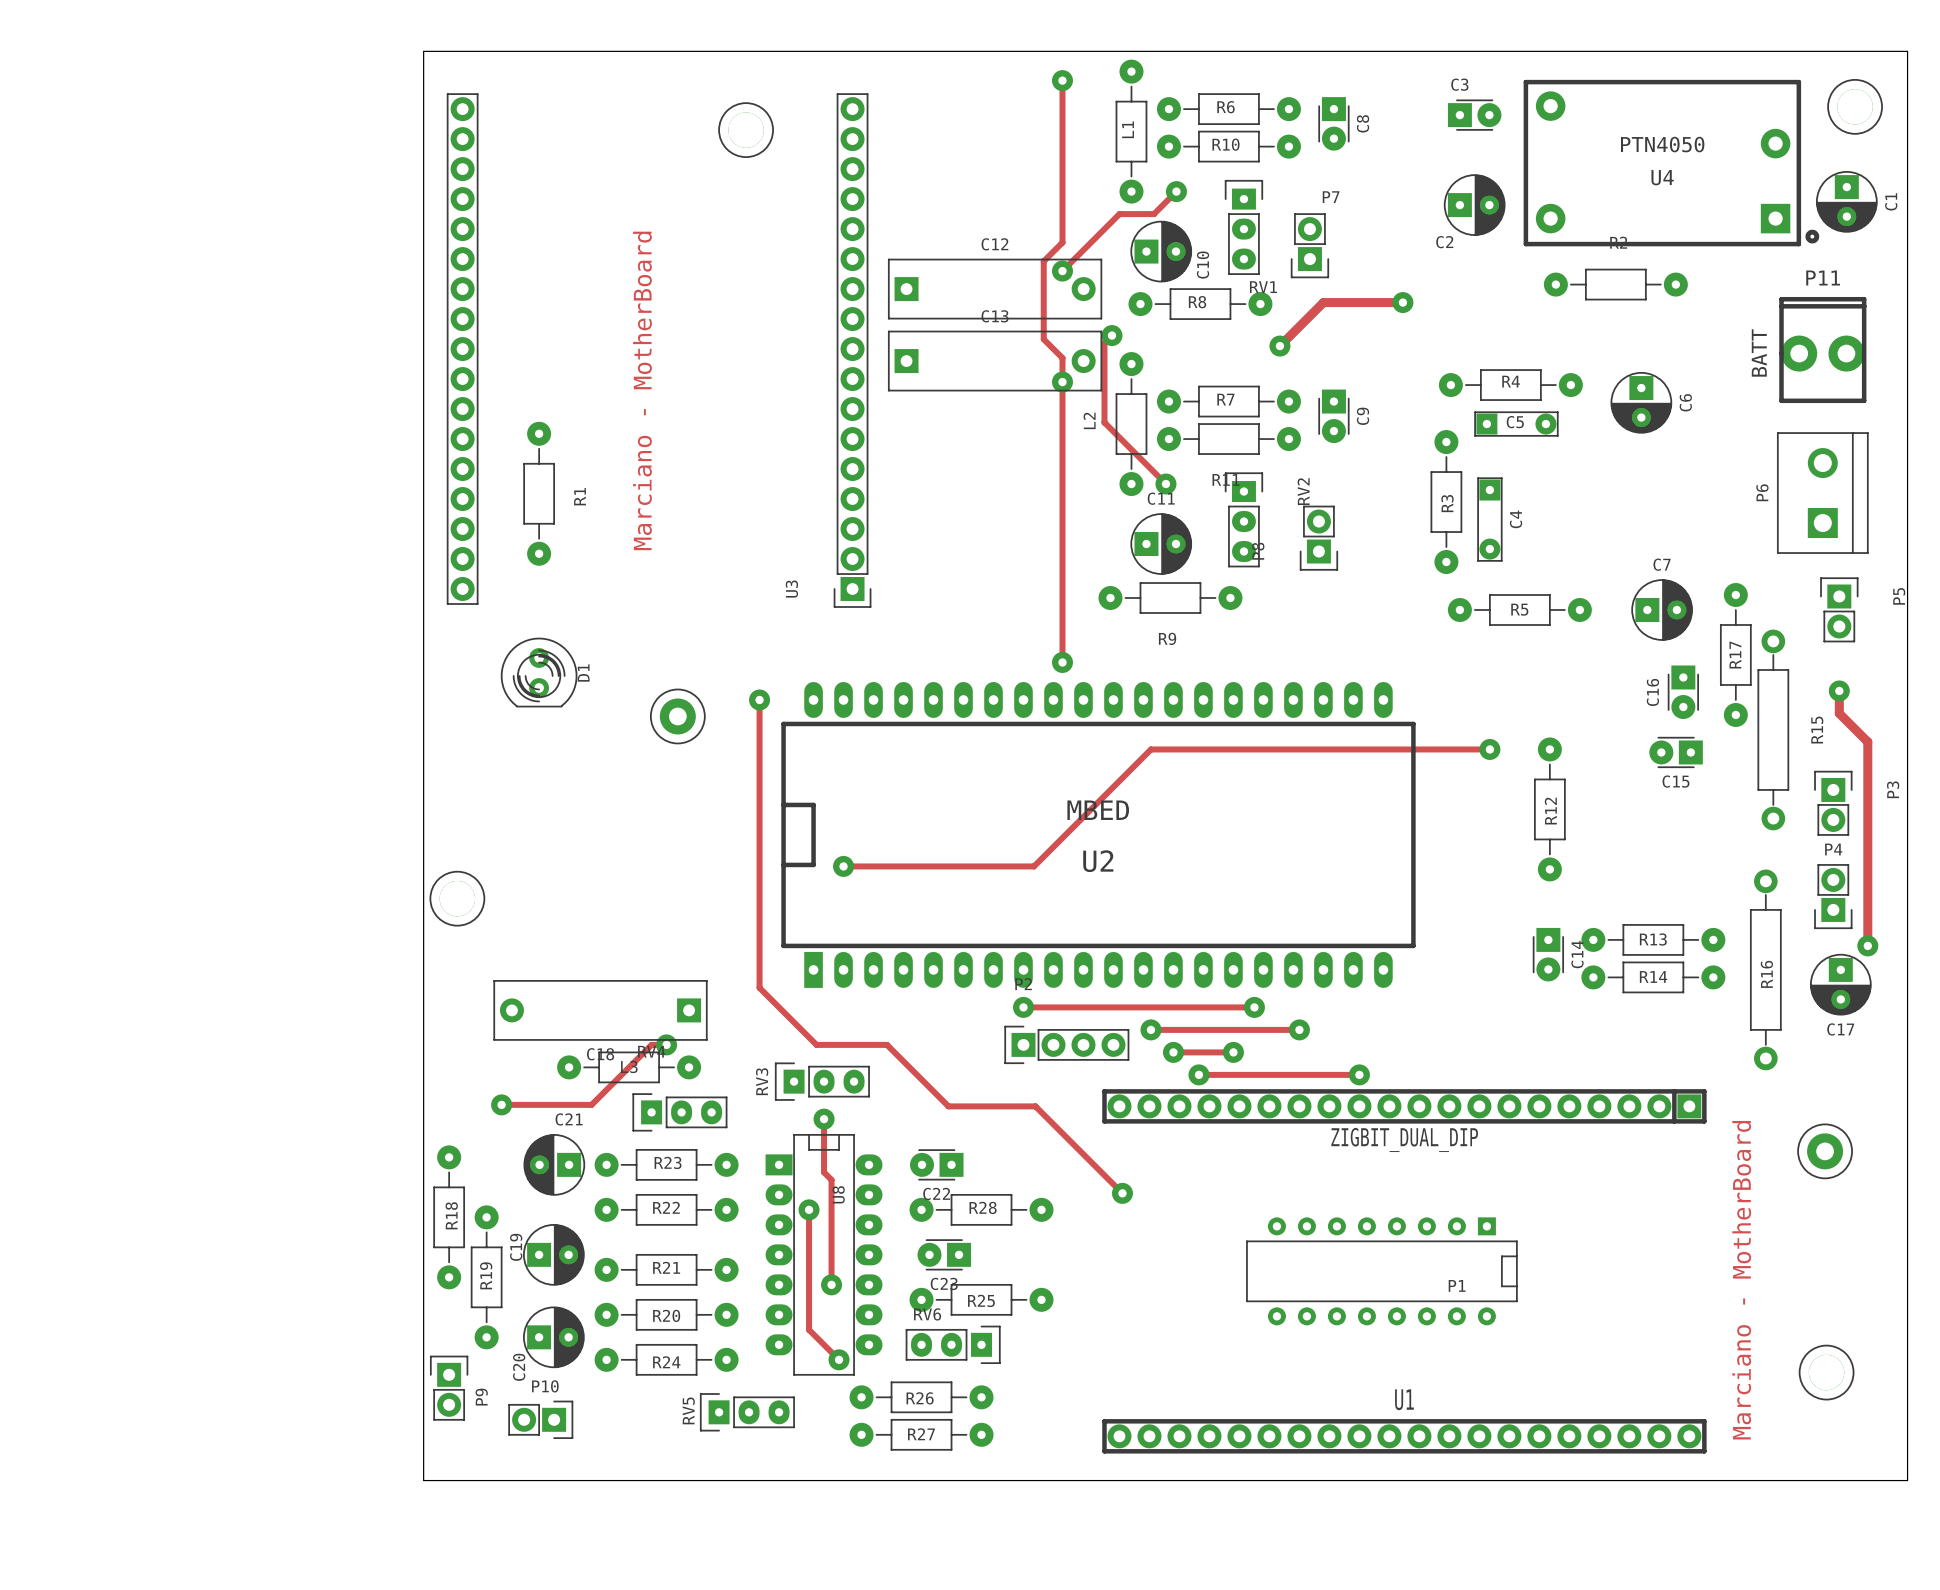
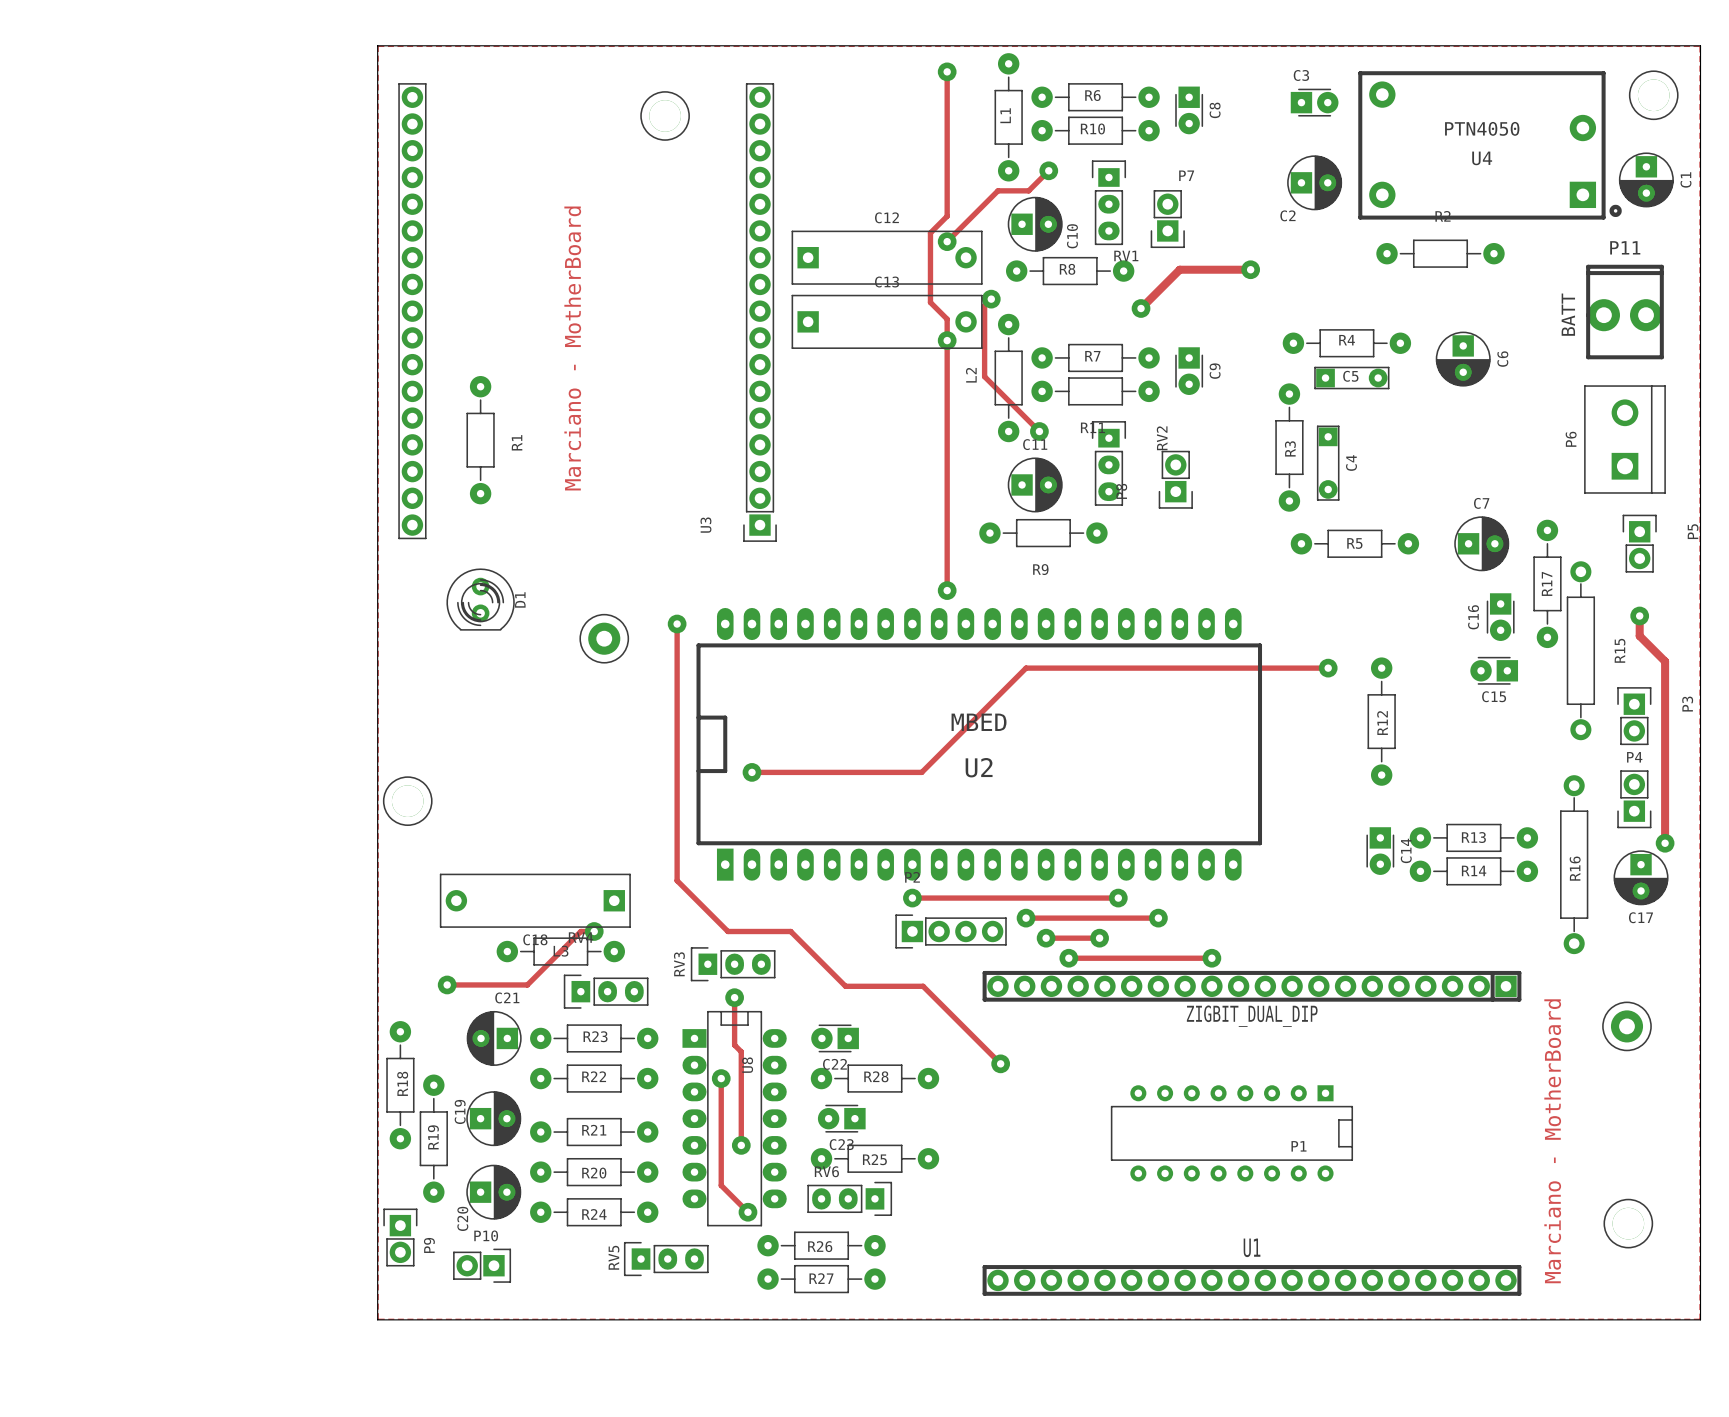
zone outline: none -> (378, 46) (1699, 46) (1699, 1319) (378, 1319) (378, 46)

